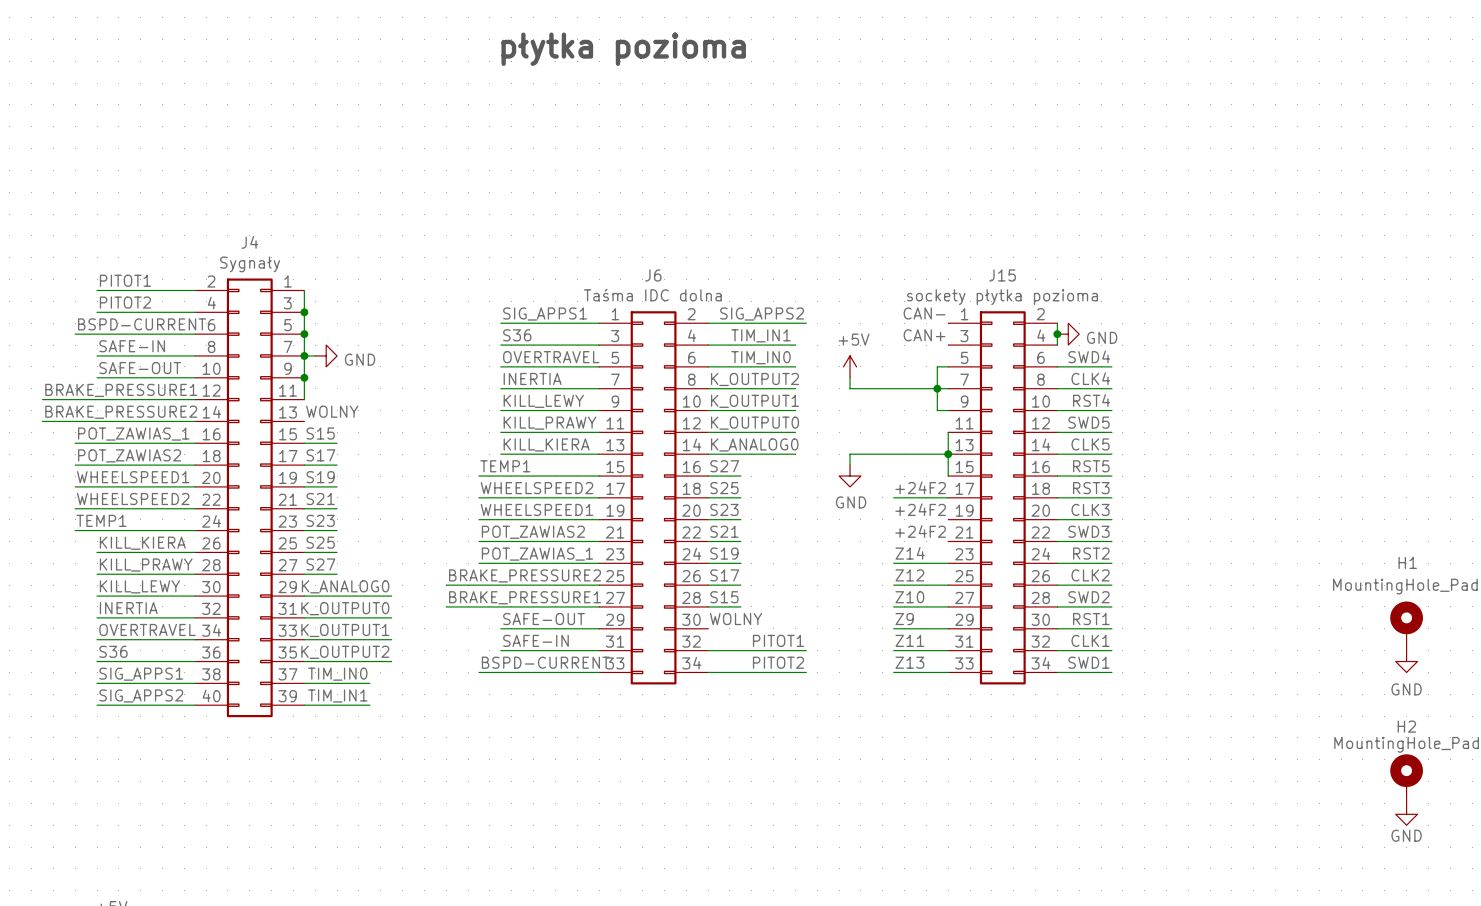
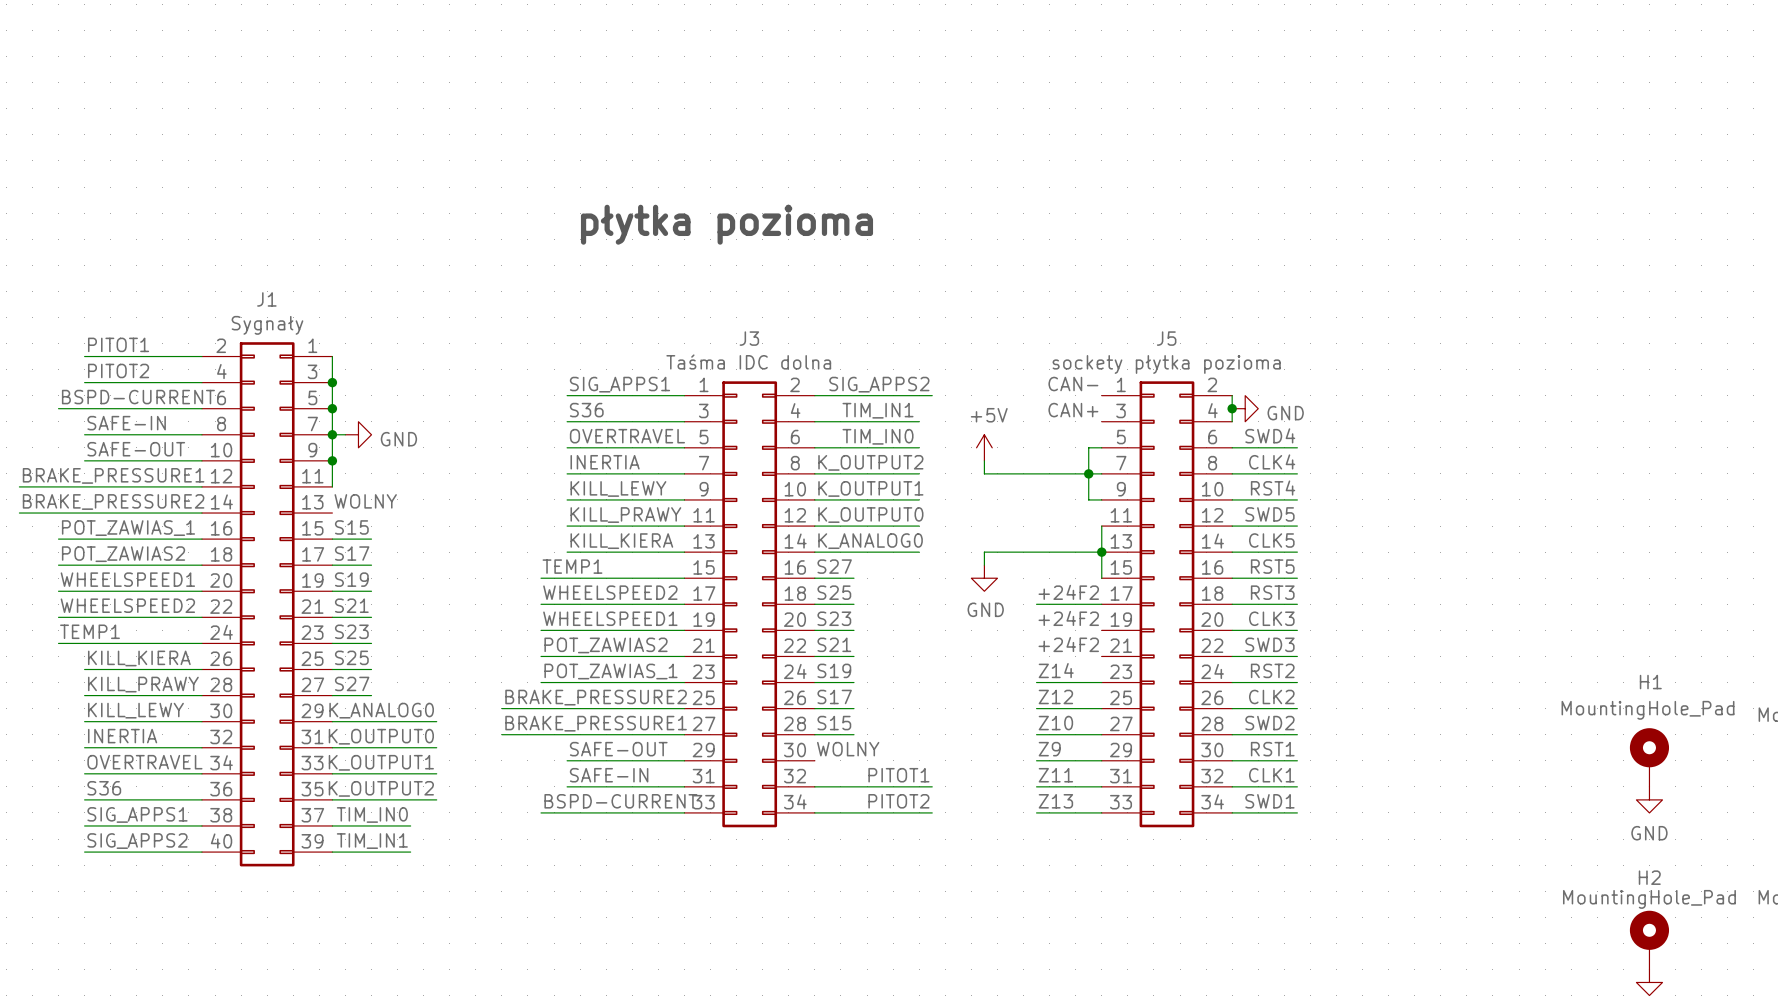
text position: płytka pozioma (623, 49) -> płytka pozioma (726, 224)
J4 name: J4 (249, 242) -> J1 (266, 299)
J6 name: J6 (653, 275) -> J3 (749, 338)
J15 name: J15 (1002, 275) -> J5 (1166, 338)

